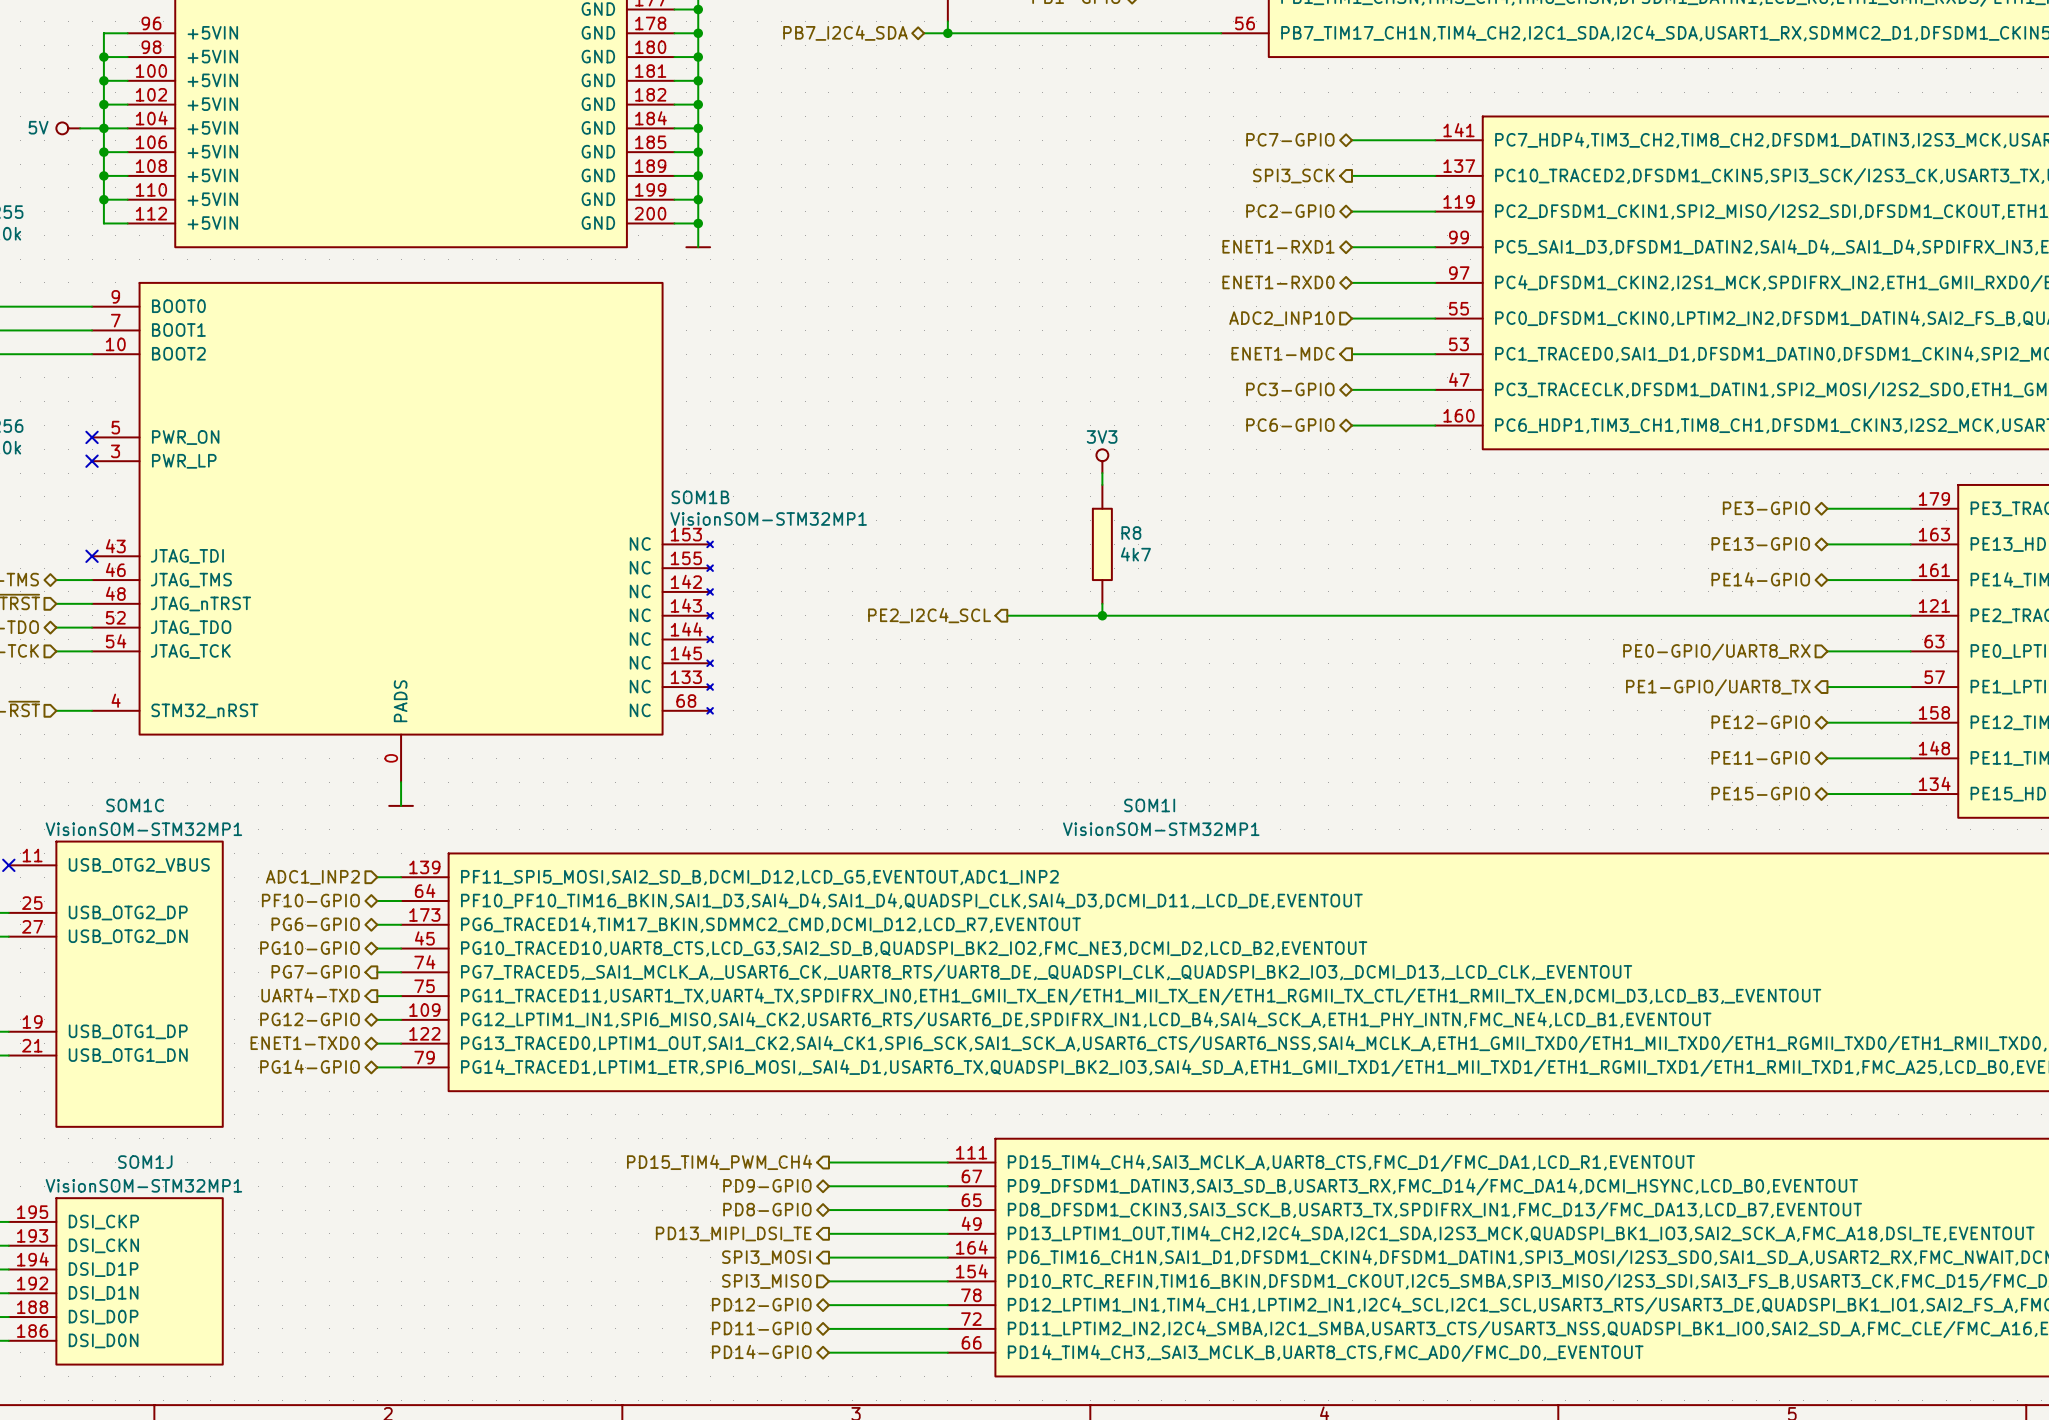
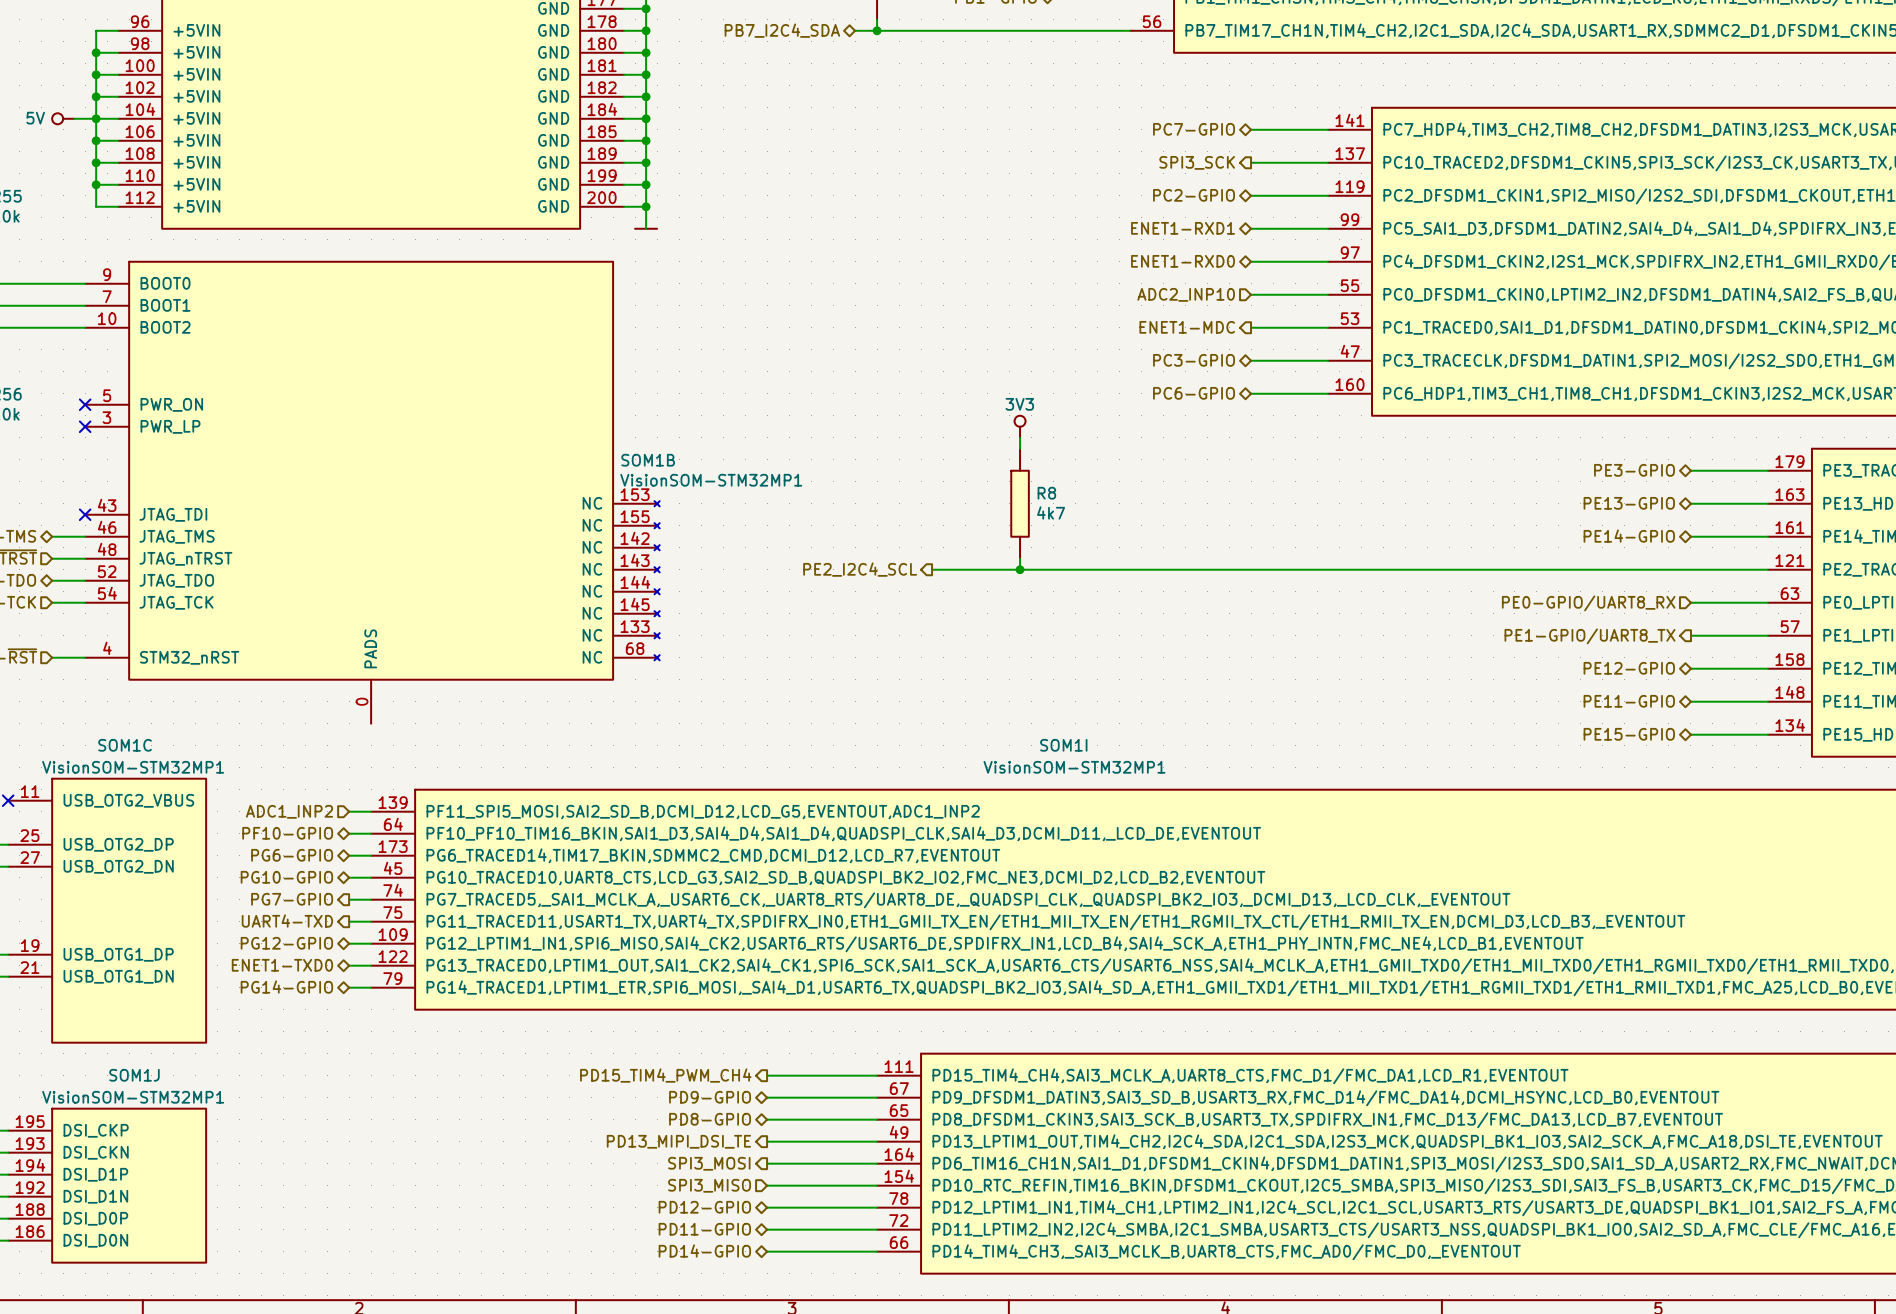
wire: (401, 782) (401, 805) -> none
power symbol: (401, 805) -> none

